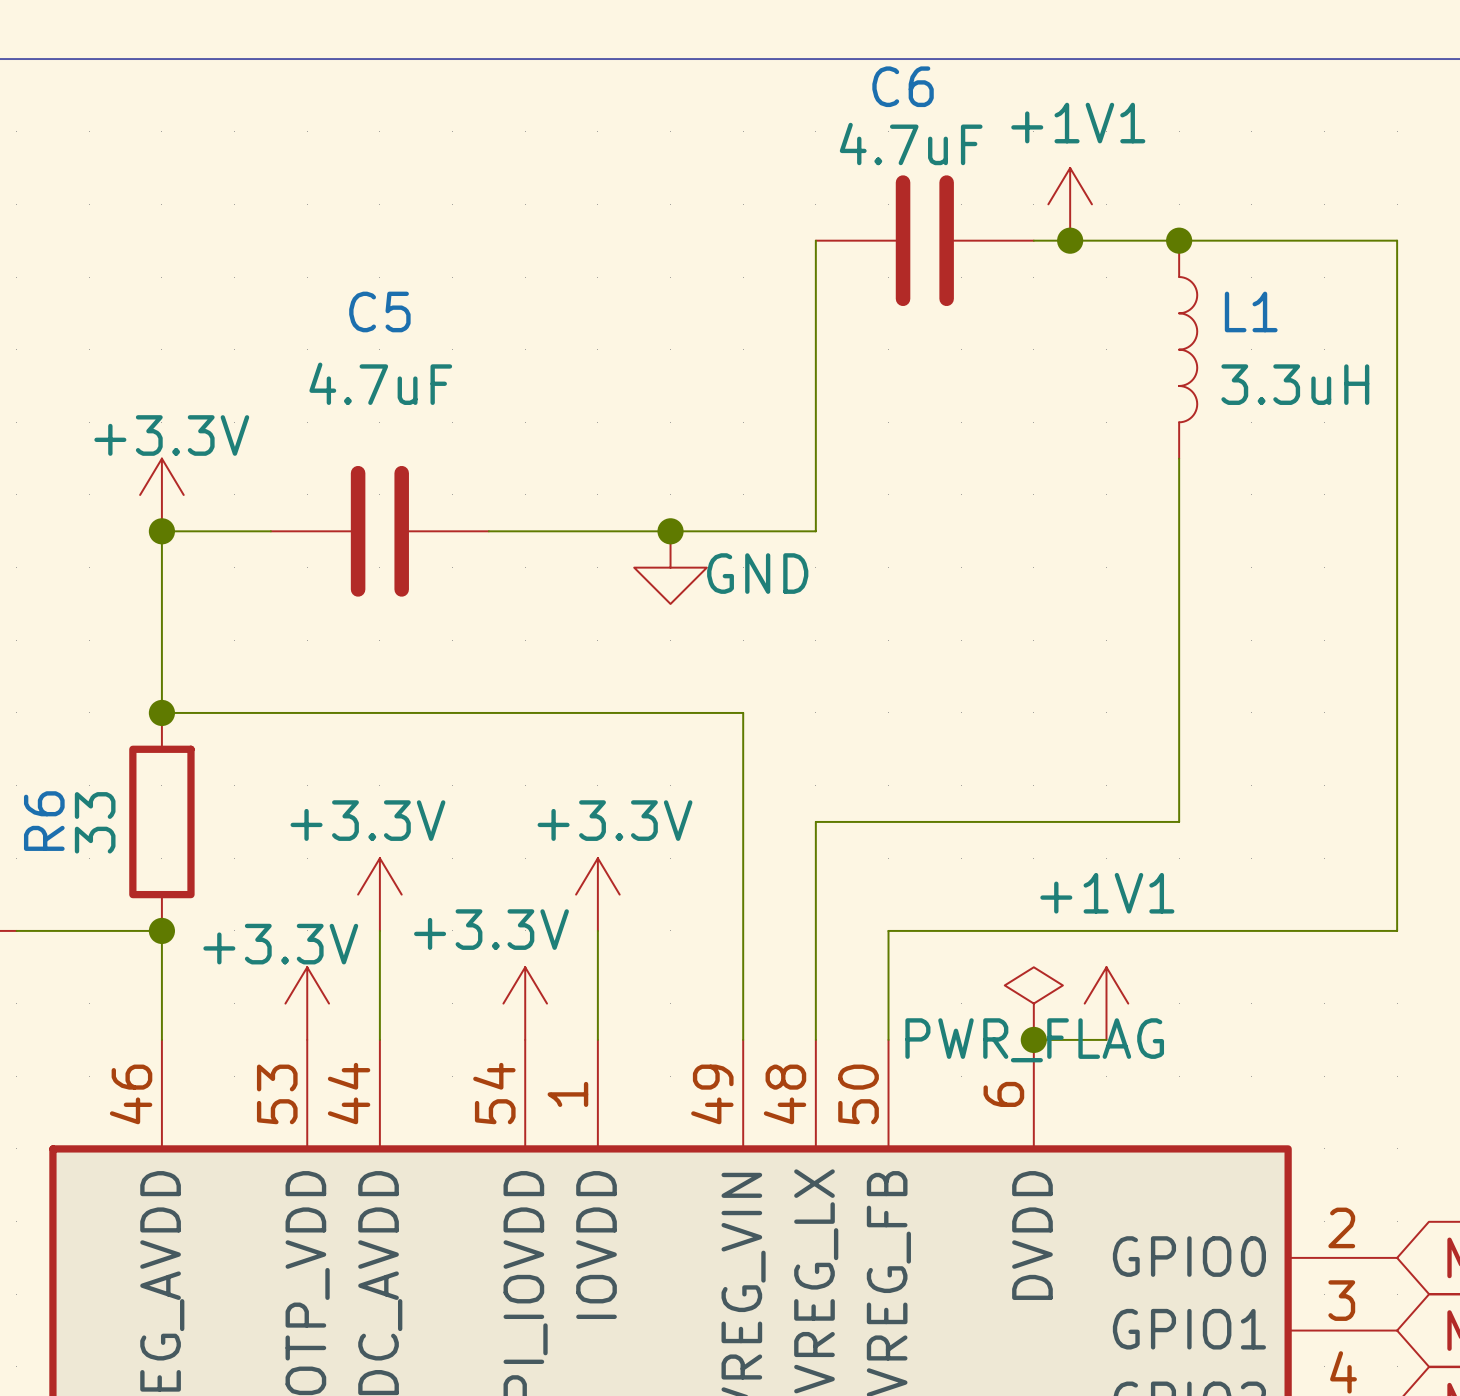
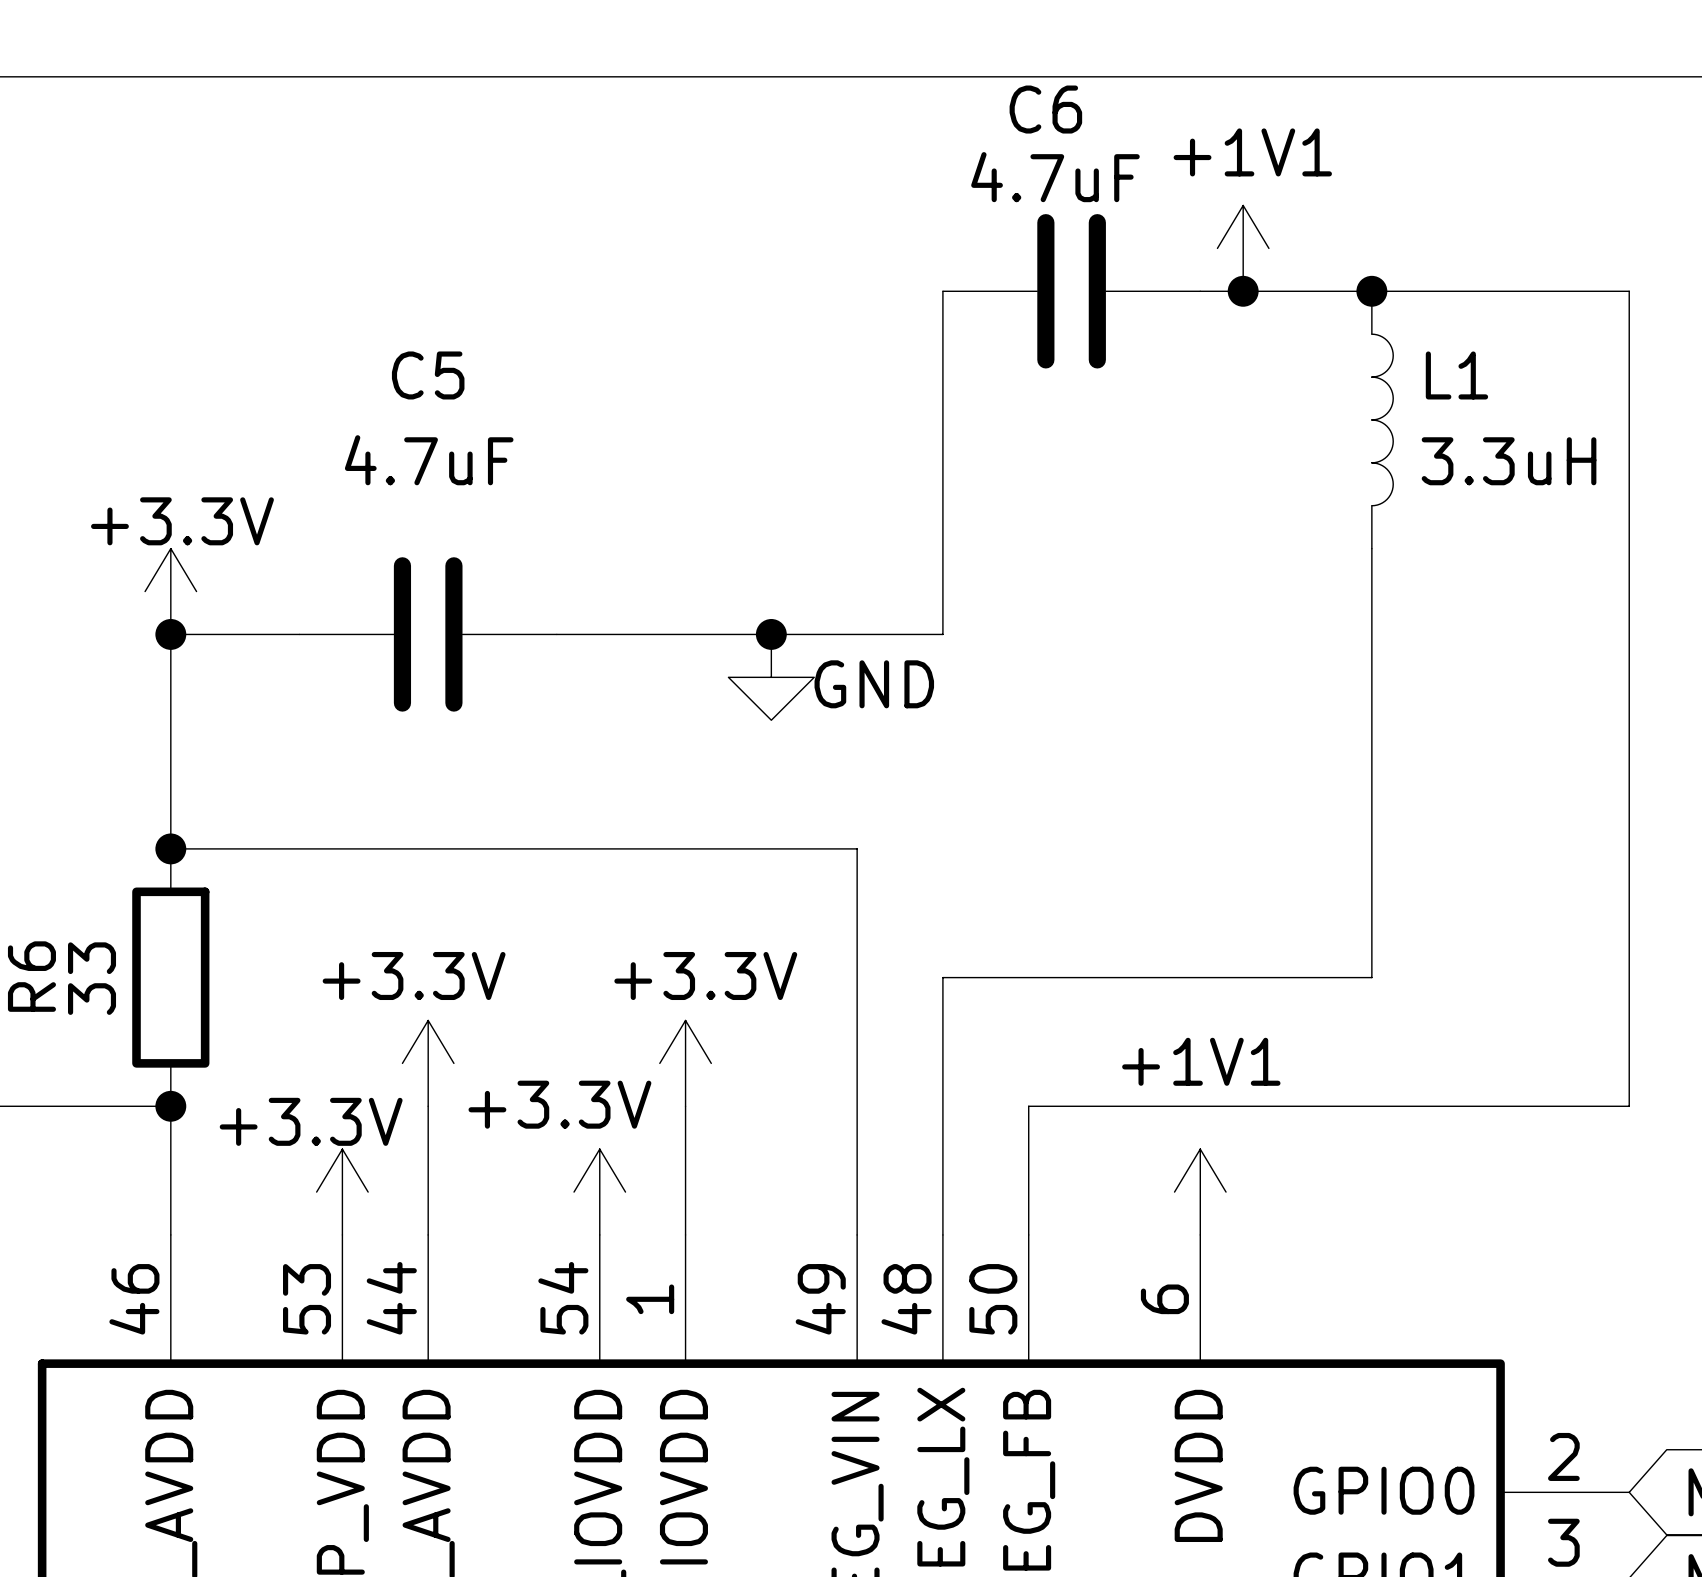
power symbol: PWR_FLAG (1033, 1003) -> +1V1 (1200, 1192)
power symbol: +1V1 (1106, 1003) -> none
wire: (1033, 1039) (1106, 1039) -> none
junction: (1033, 1039) -> none

